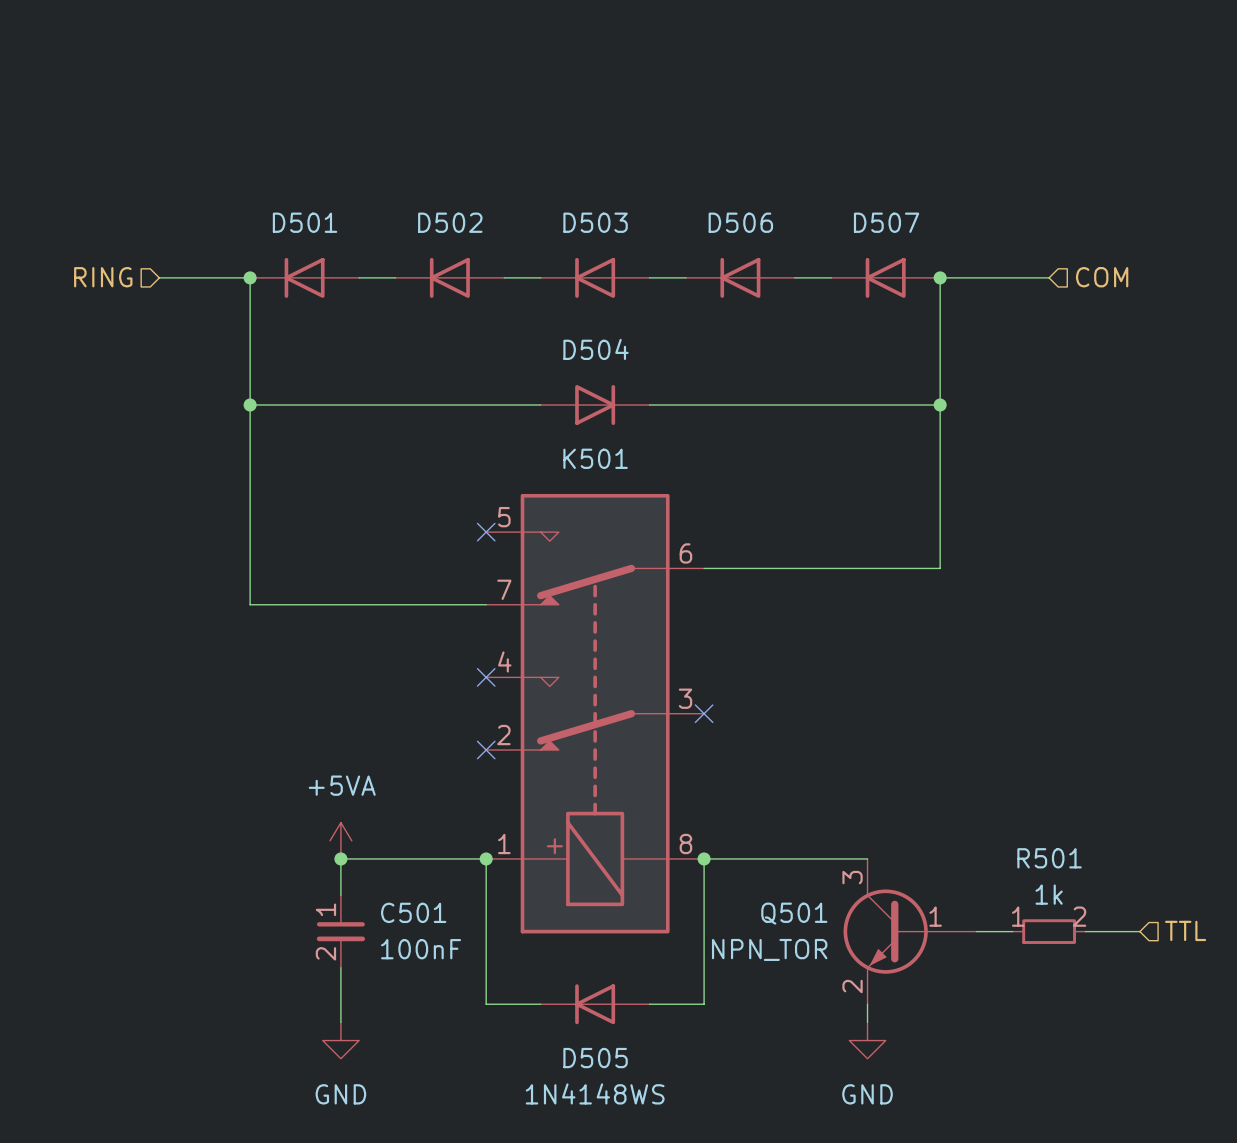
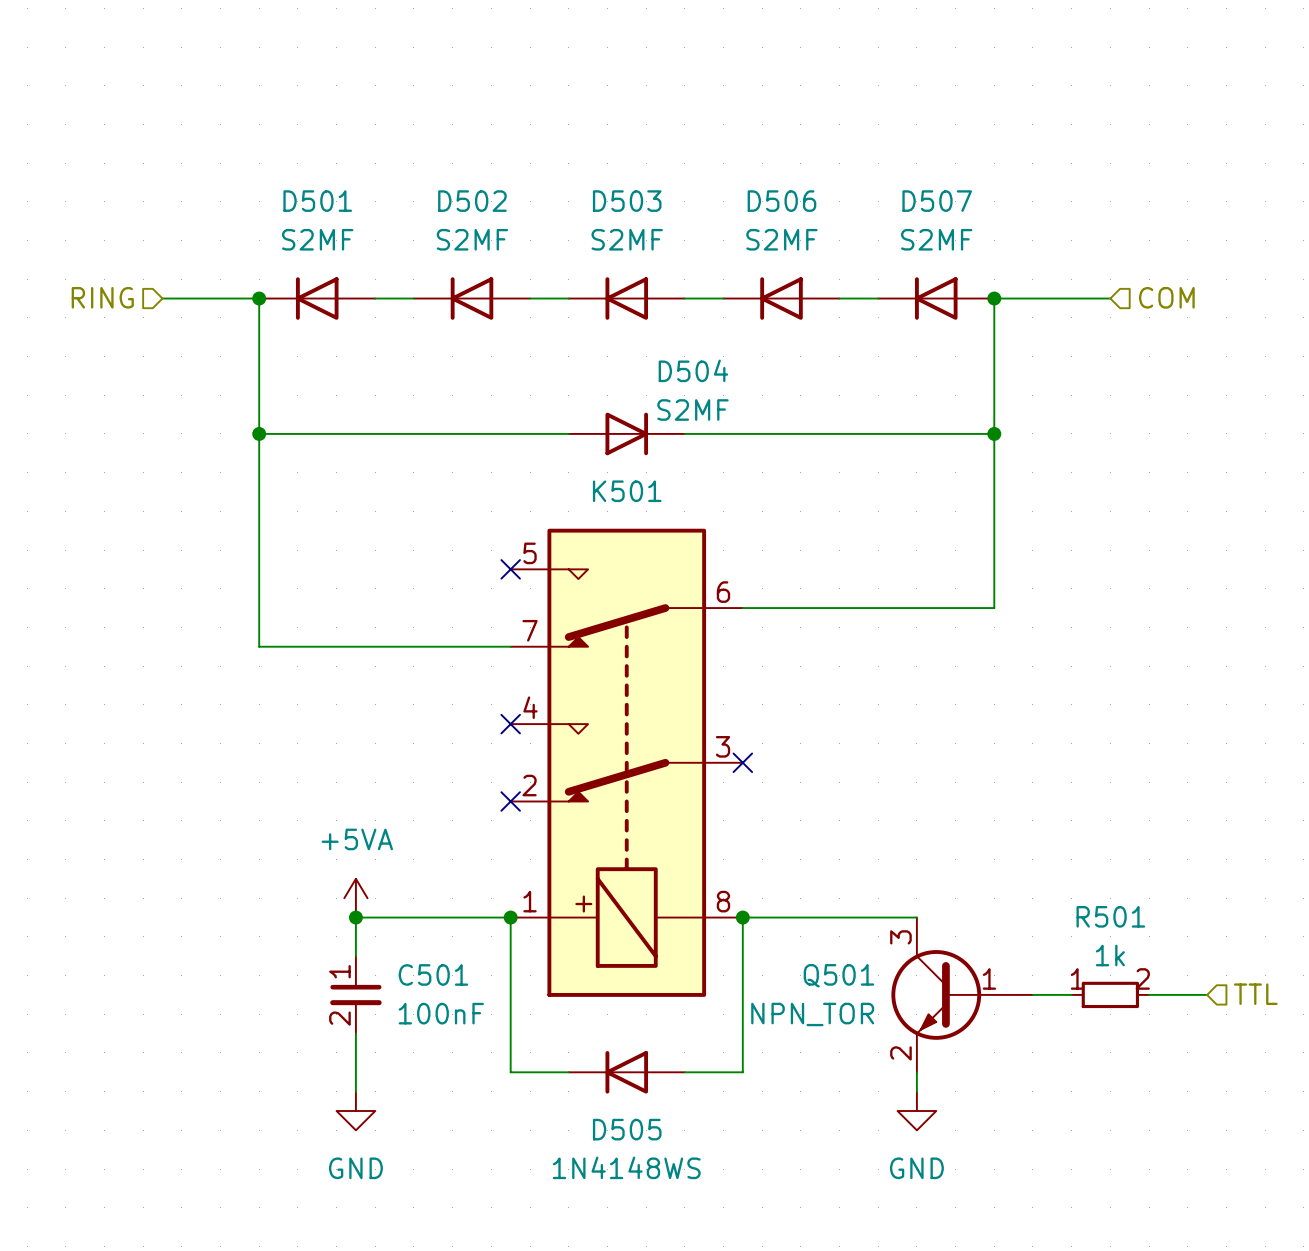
D501 name position: D501 (305, 222) -> D501 (317, 201)
D501 value: none -> S2MF (317, 239)
D502 name position: D502 (450, 222) -> D502 (472, 201)
D502 value: none -> S2MF (472, 239)
D503 name position: D503 (595, 222) -> D503 (627, 201)
D503 value: none -> S2MF (627, 239)
D506 name position: D506 (740, 222) -> D506 (781, 201)
D506 value: none -> S2MF (781, 239)
D507 name position: D507 (886, 222) -> D507 (937, 201)
D507 value: none -> S2MF (936, 239)
D504 name position: D504 (596, 349) -> D504 (693, 370)
D504 value: none -> S2MF (692, 410)

